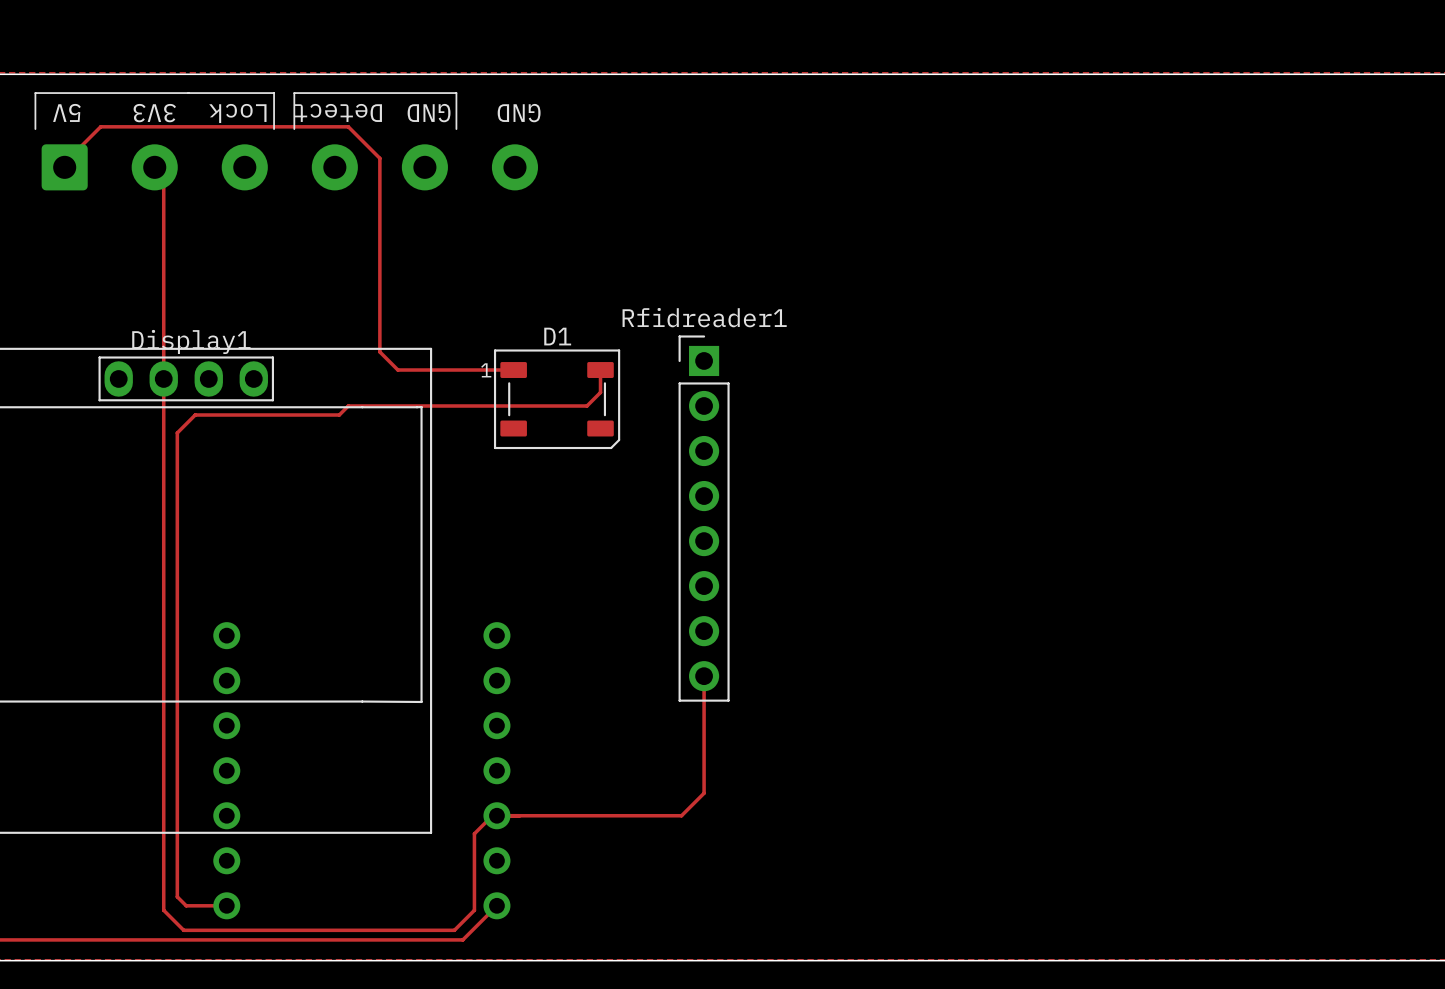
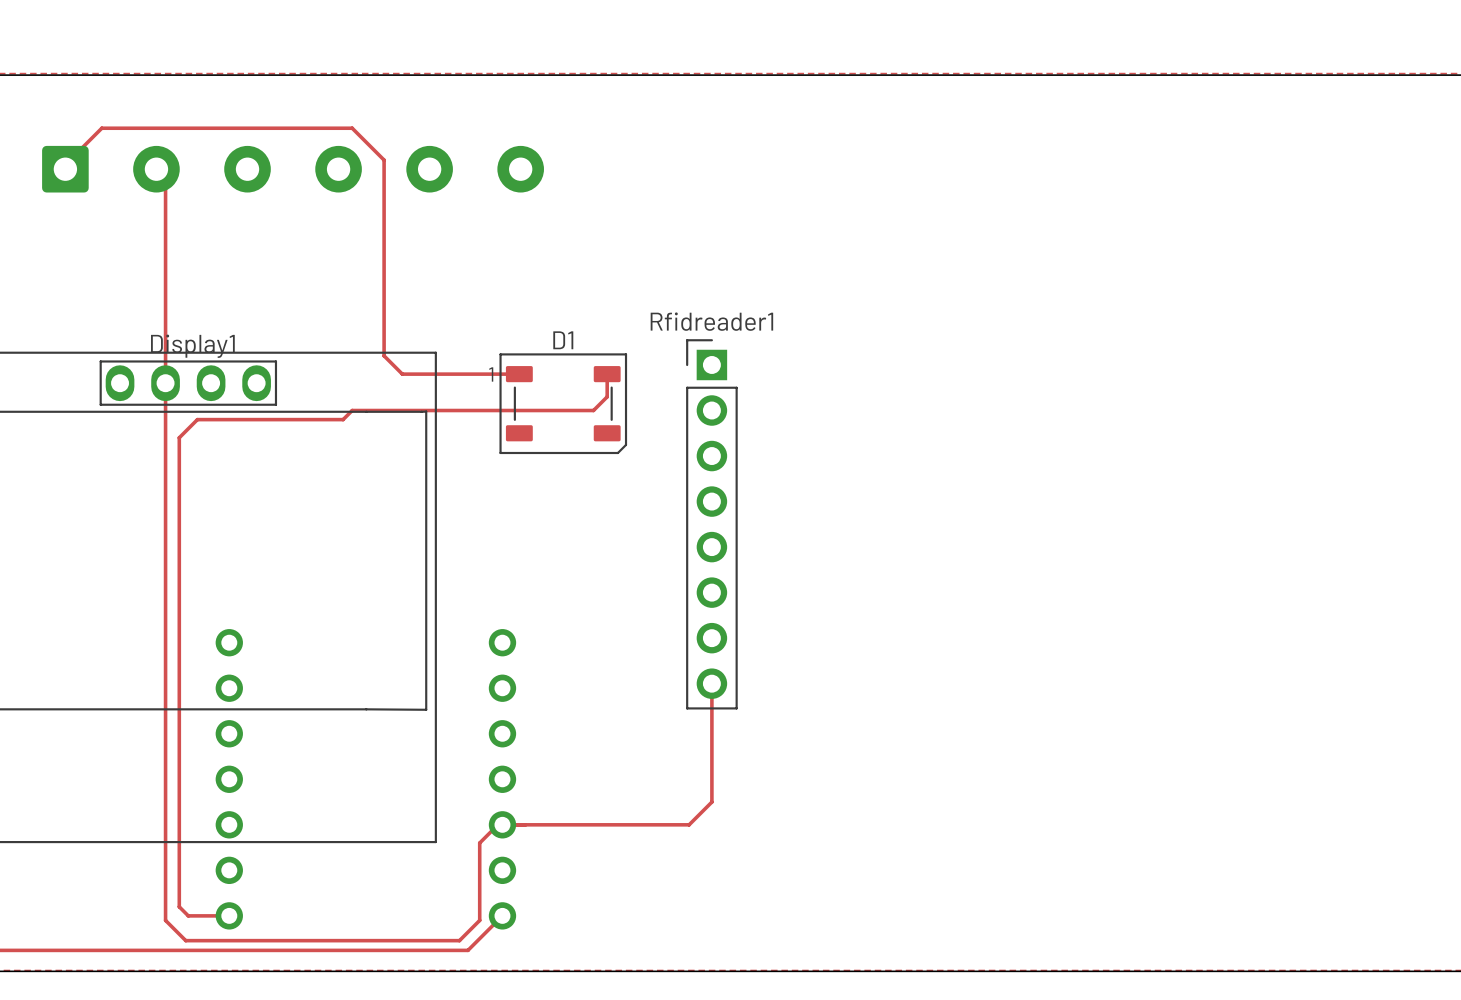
text: 5V (66, 112) -> none
text: Detect (338, 112) -> none
text: 3V3 (154, 113) -> none
text: Lock (237, 113) -> none
text: GND (429, 113) -> none
text: GND (519, 113) -> none
line: (35, 129) (35, 93) (274, 93) (274, 129) -> none
line: (294, 129) (294, 93) (456, 93) (456, 129) -> none

